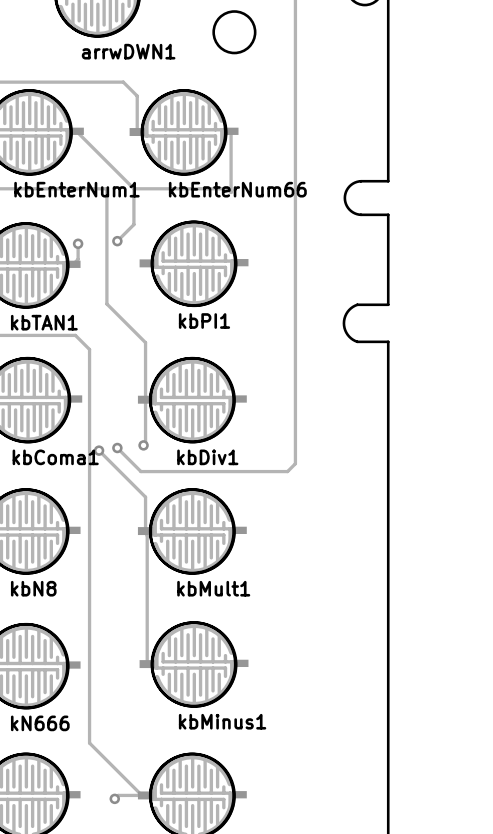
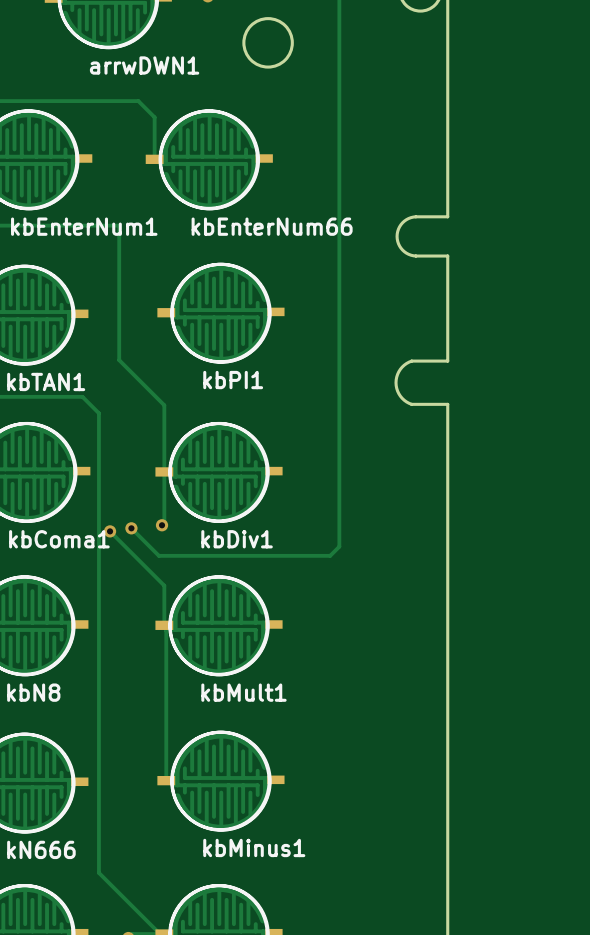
track: (76, 131) (133, 188) -> none
track: (231, 131) (231, 192) (227, 188) (133, 188) -> none
track: (133, 188) (133, 224) (117, 241) -> none
via: (117, 241) -> none
track: (78, 243) (78, 259) (73, 264) -> none
via: (78, 243) -> none

